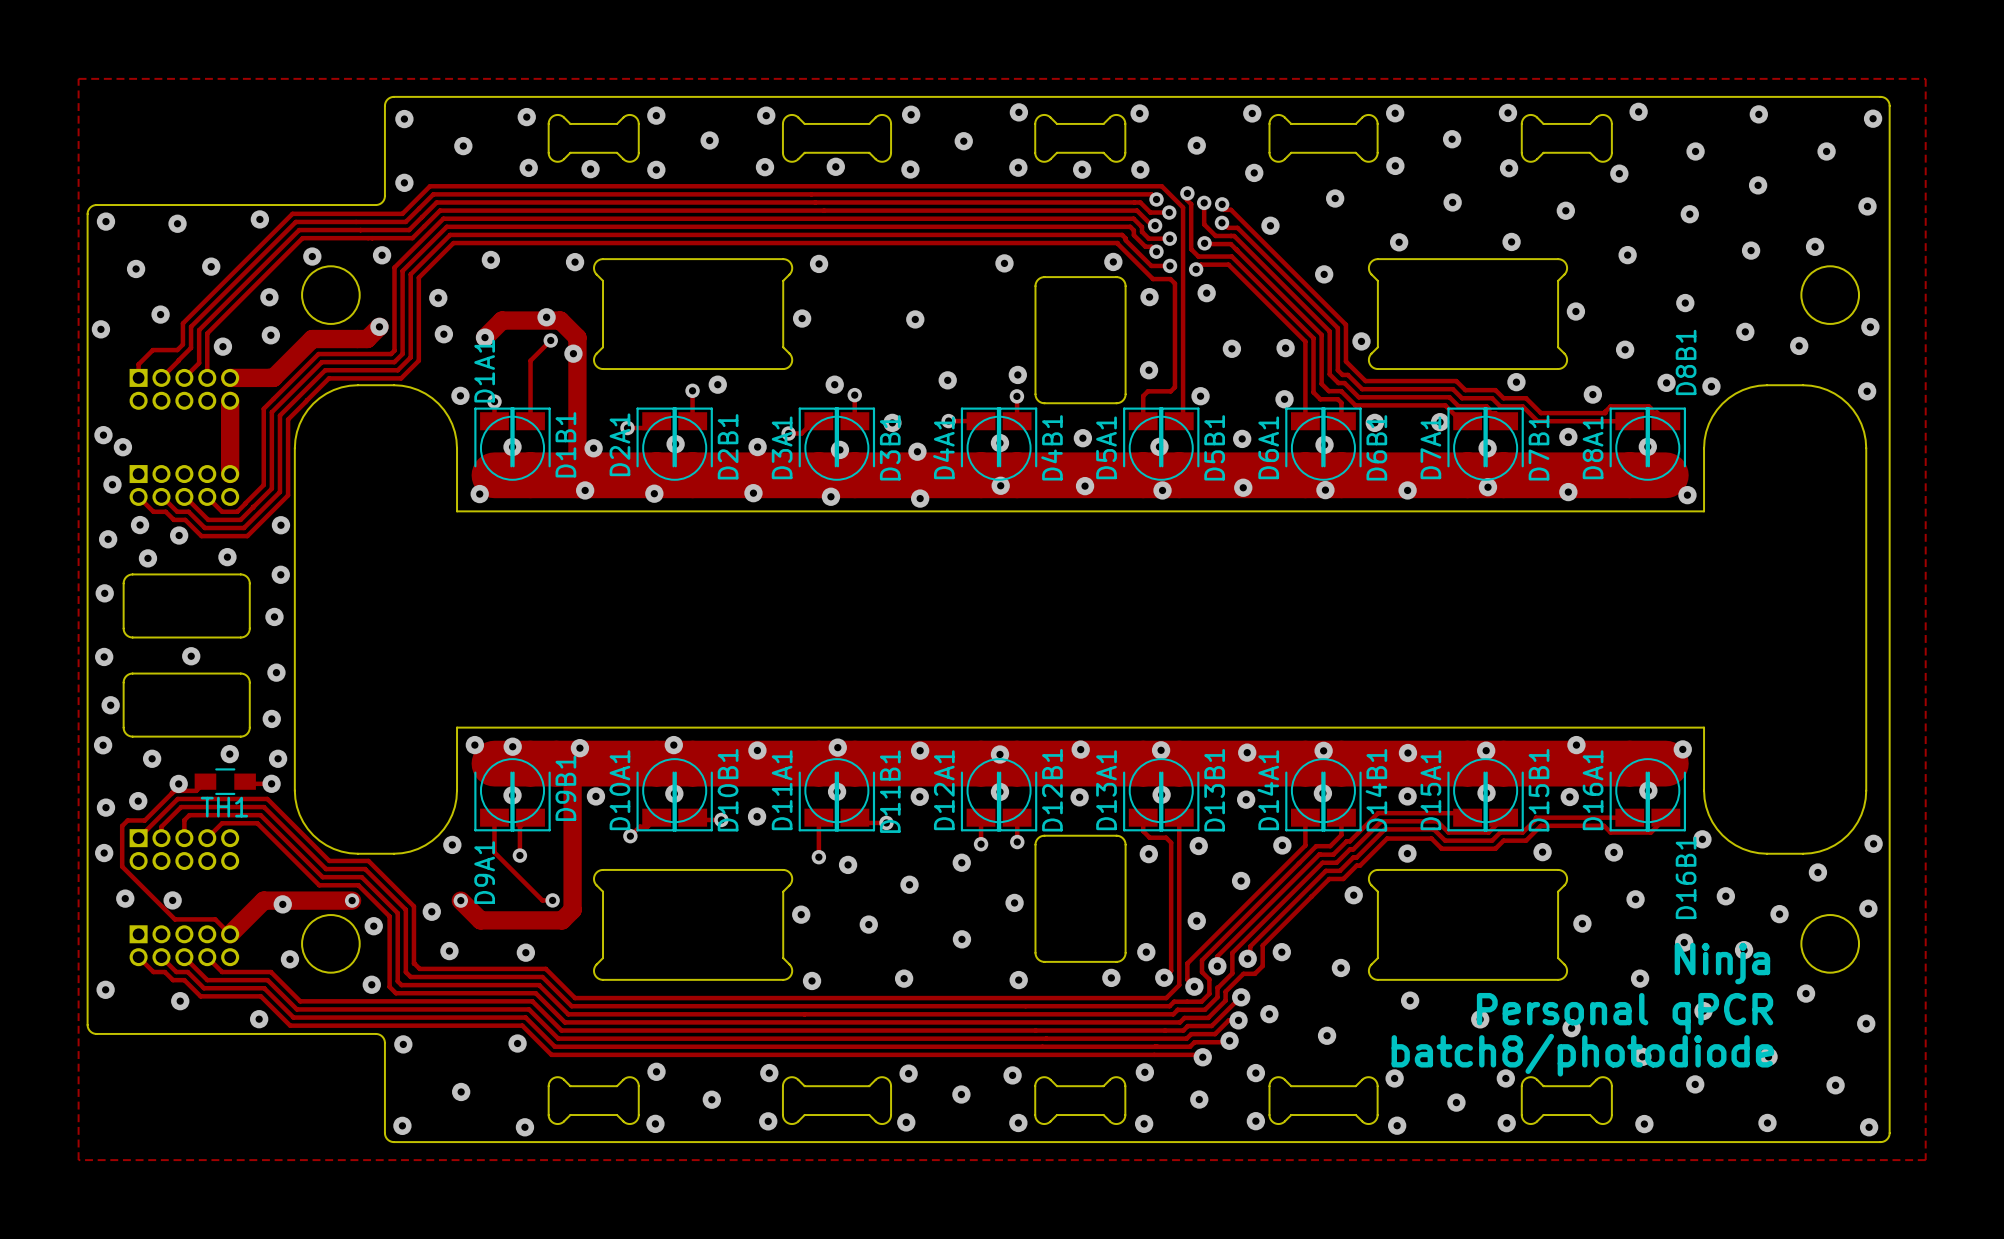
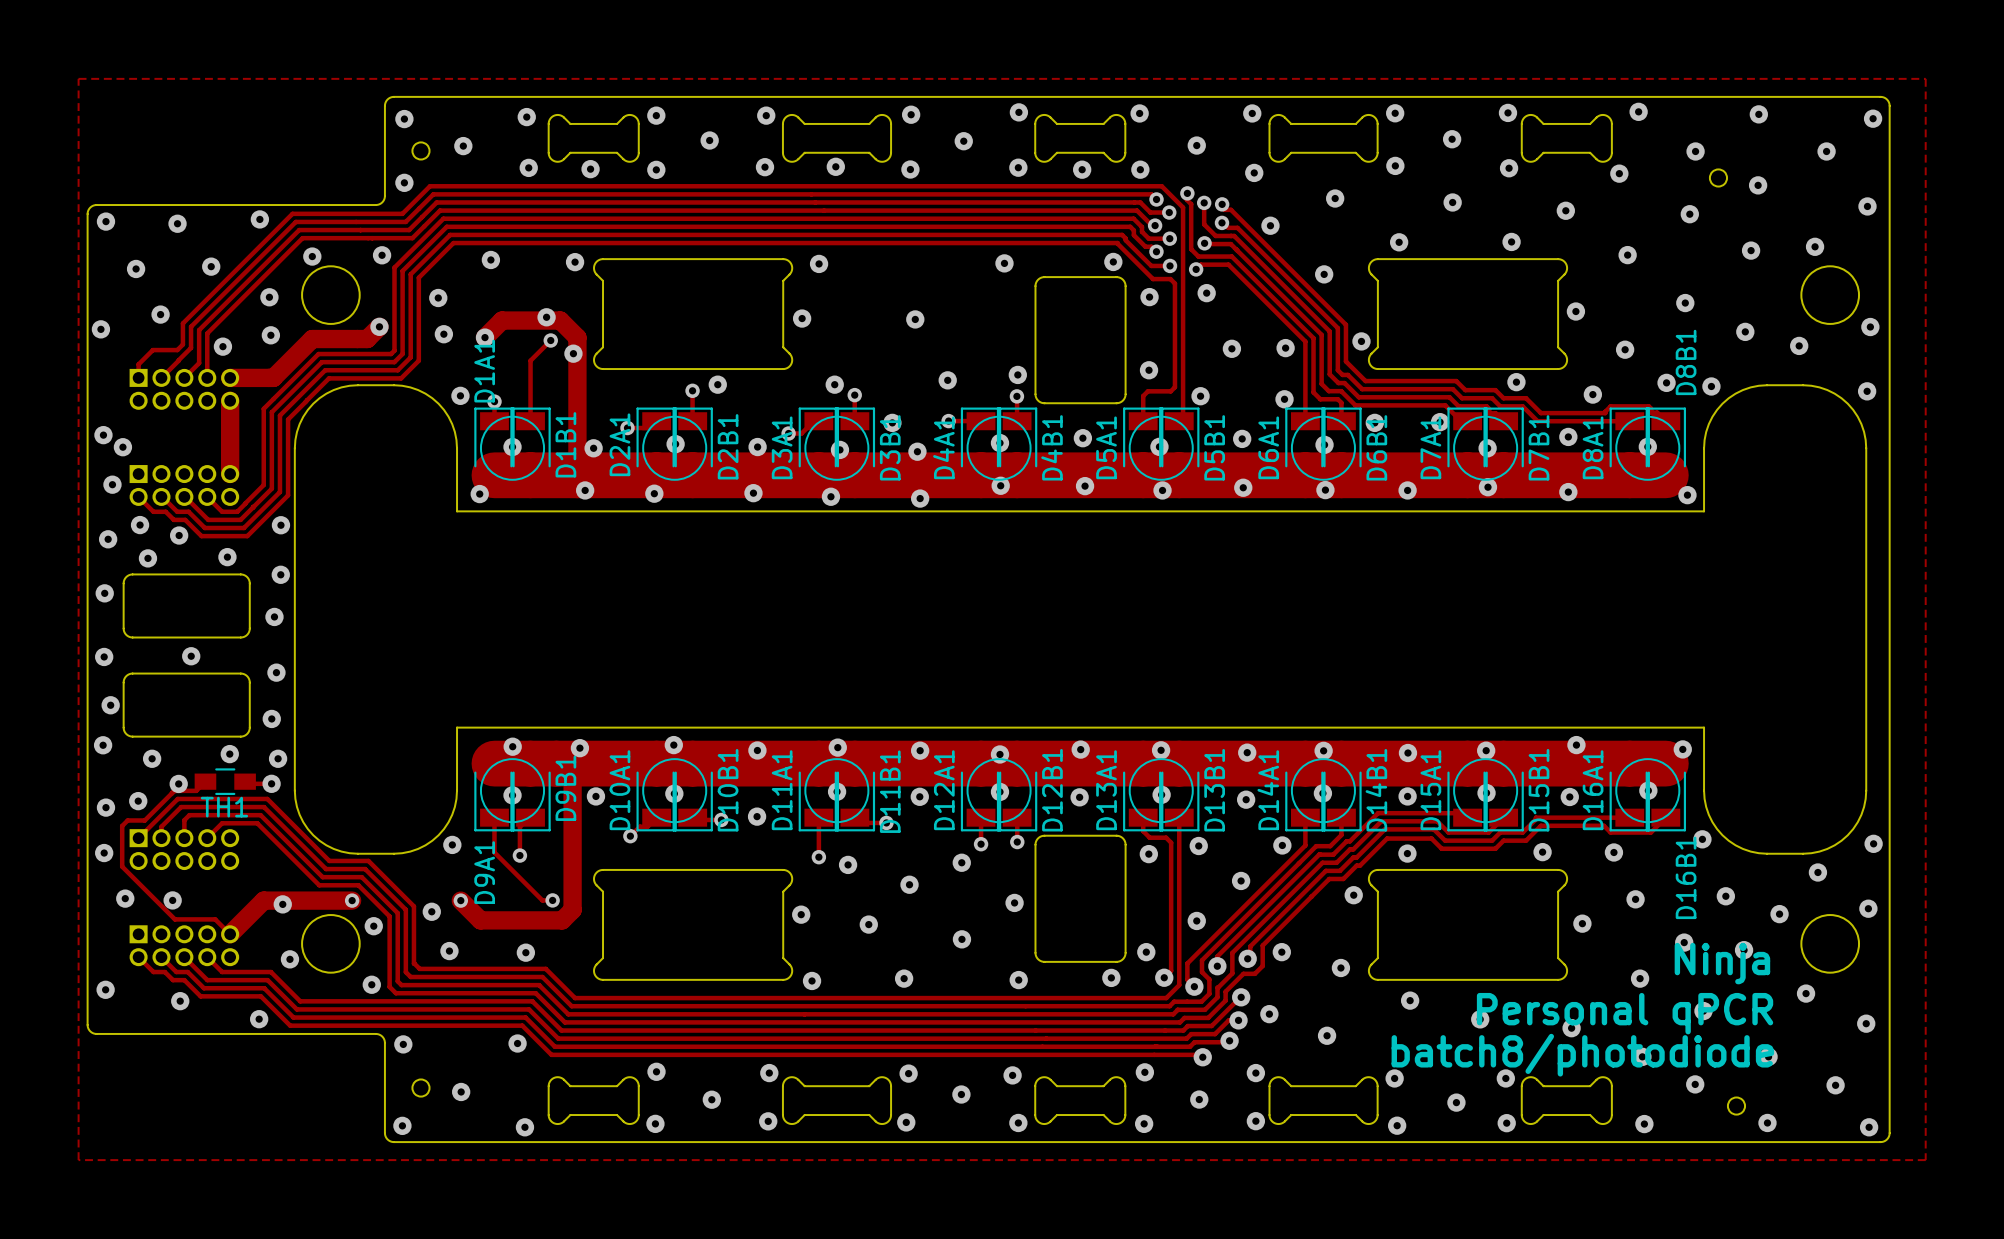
round board edge: none -> [411, 141, 431, 161]
round board edge: none -> [1709, 168, 1728, 188]
via: (474, 745) -> none
round board edge: none -> [411, 1078, 431, 1098]
round board edge: none -> [1727, 1096, 1746, 1116]

